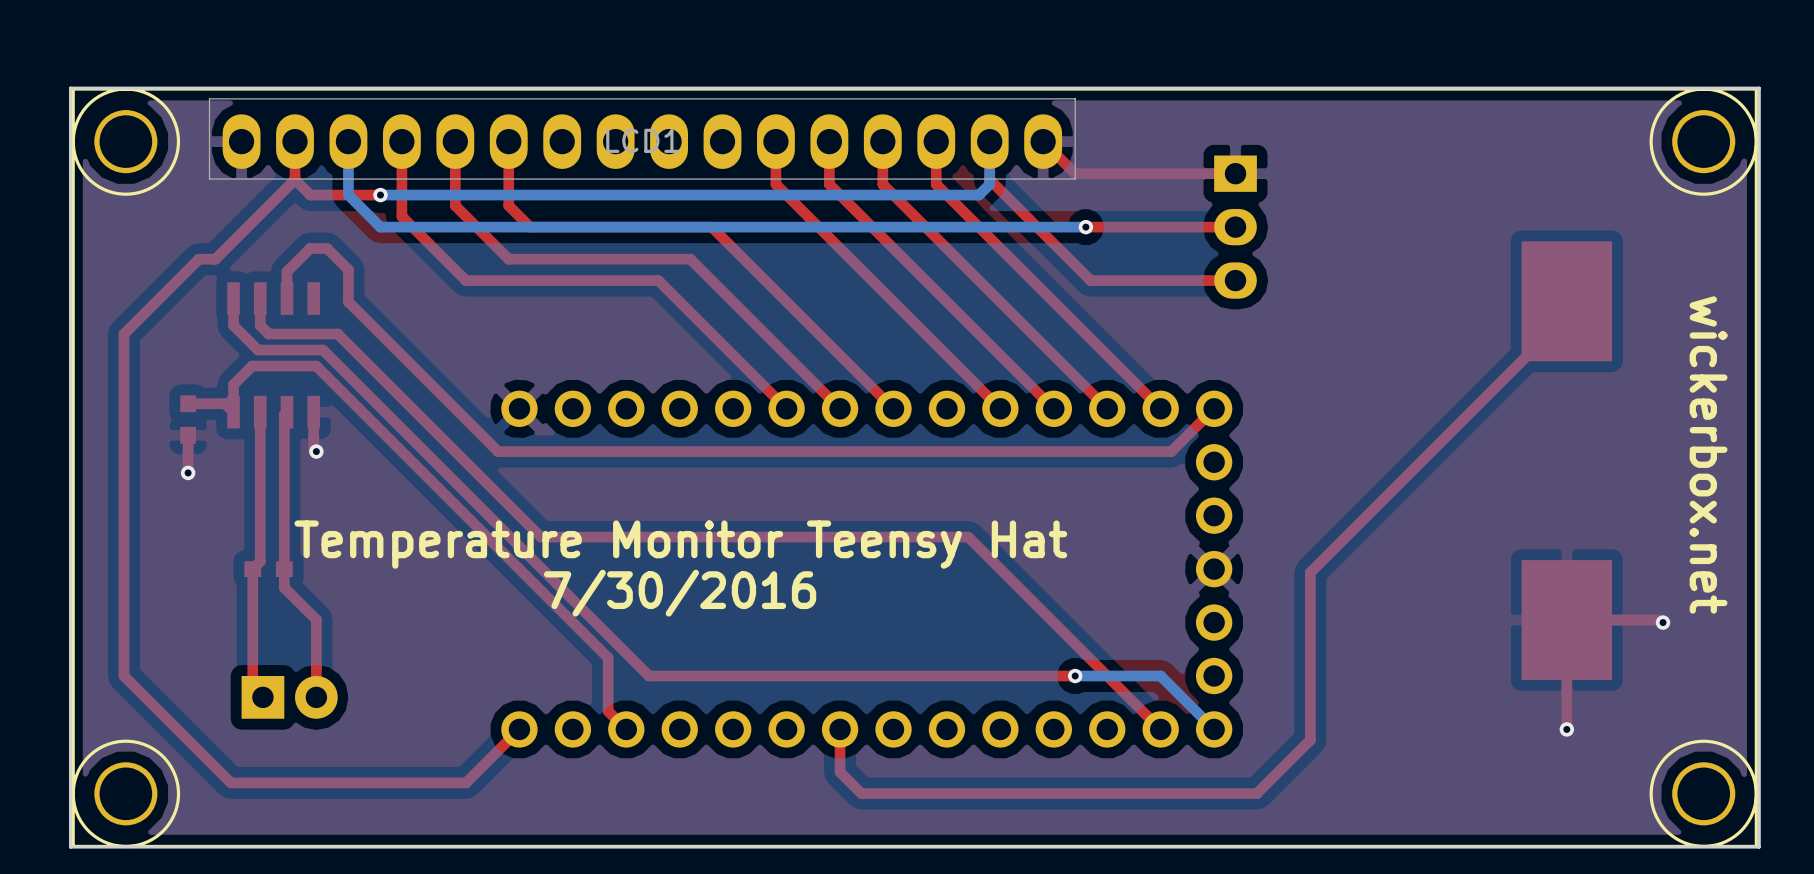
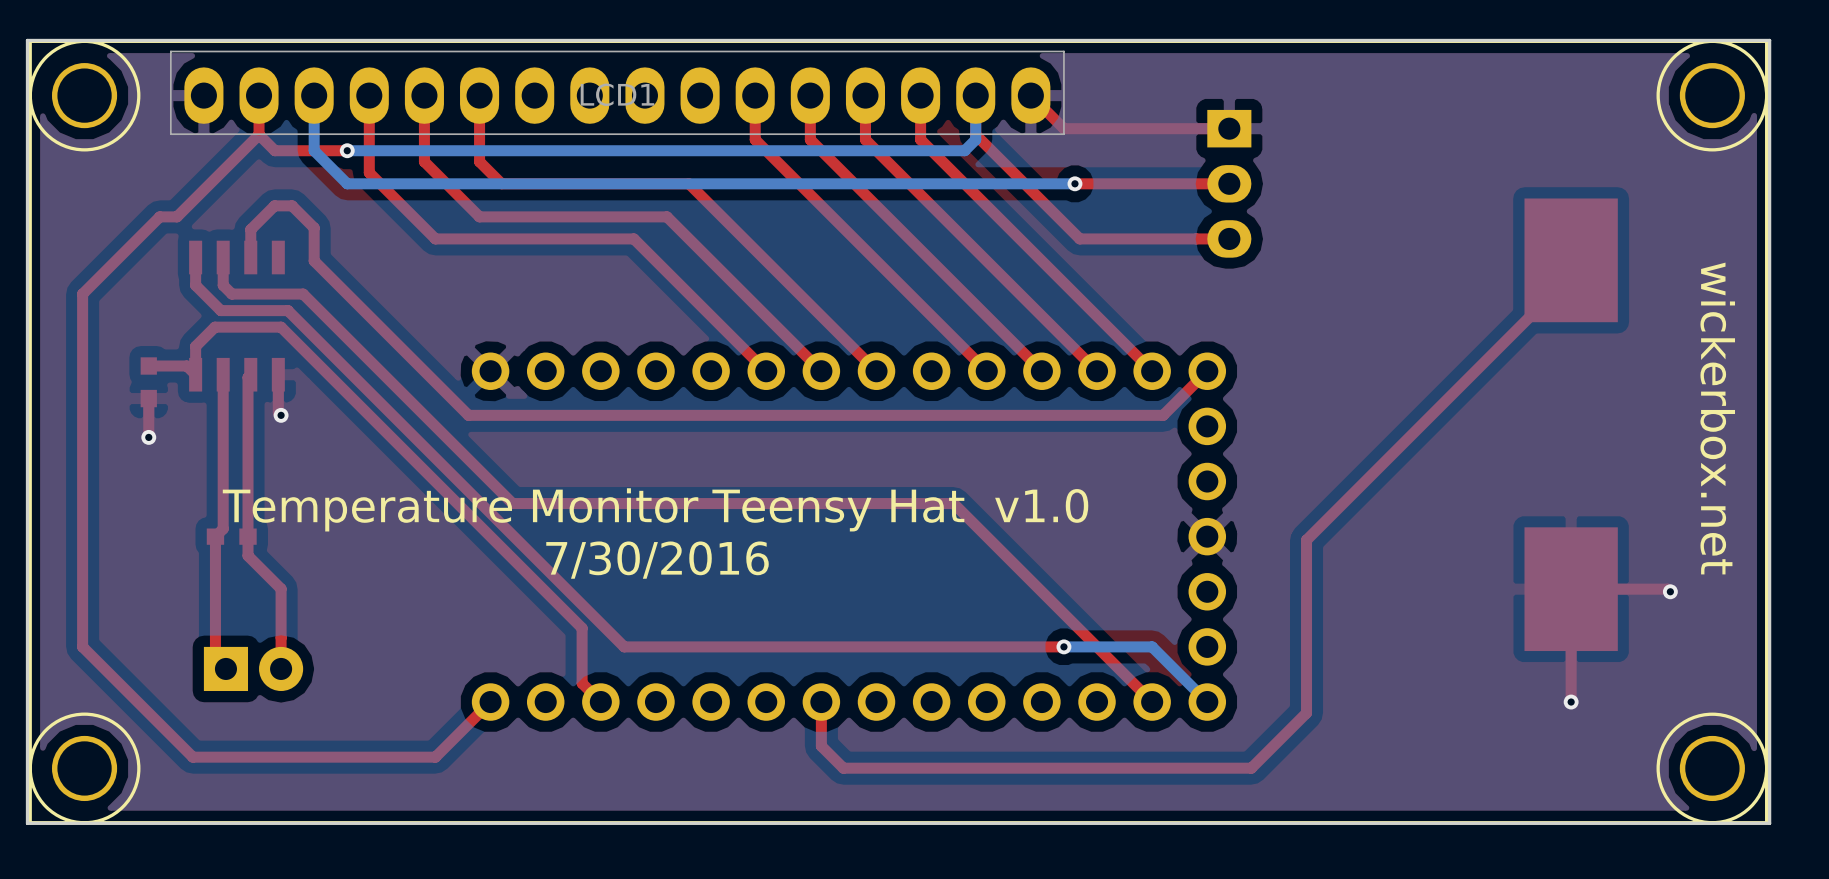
text: Temperature Monitor Teensy Hat (680, 544) -> Temperature Monitor Teensy Hat v1.0 (655, 509)

